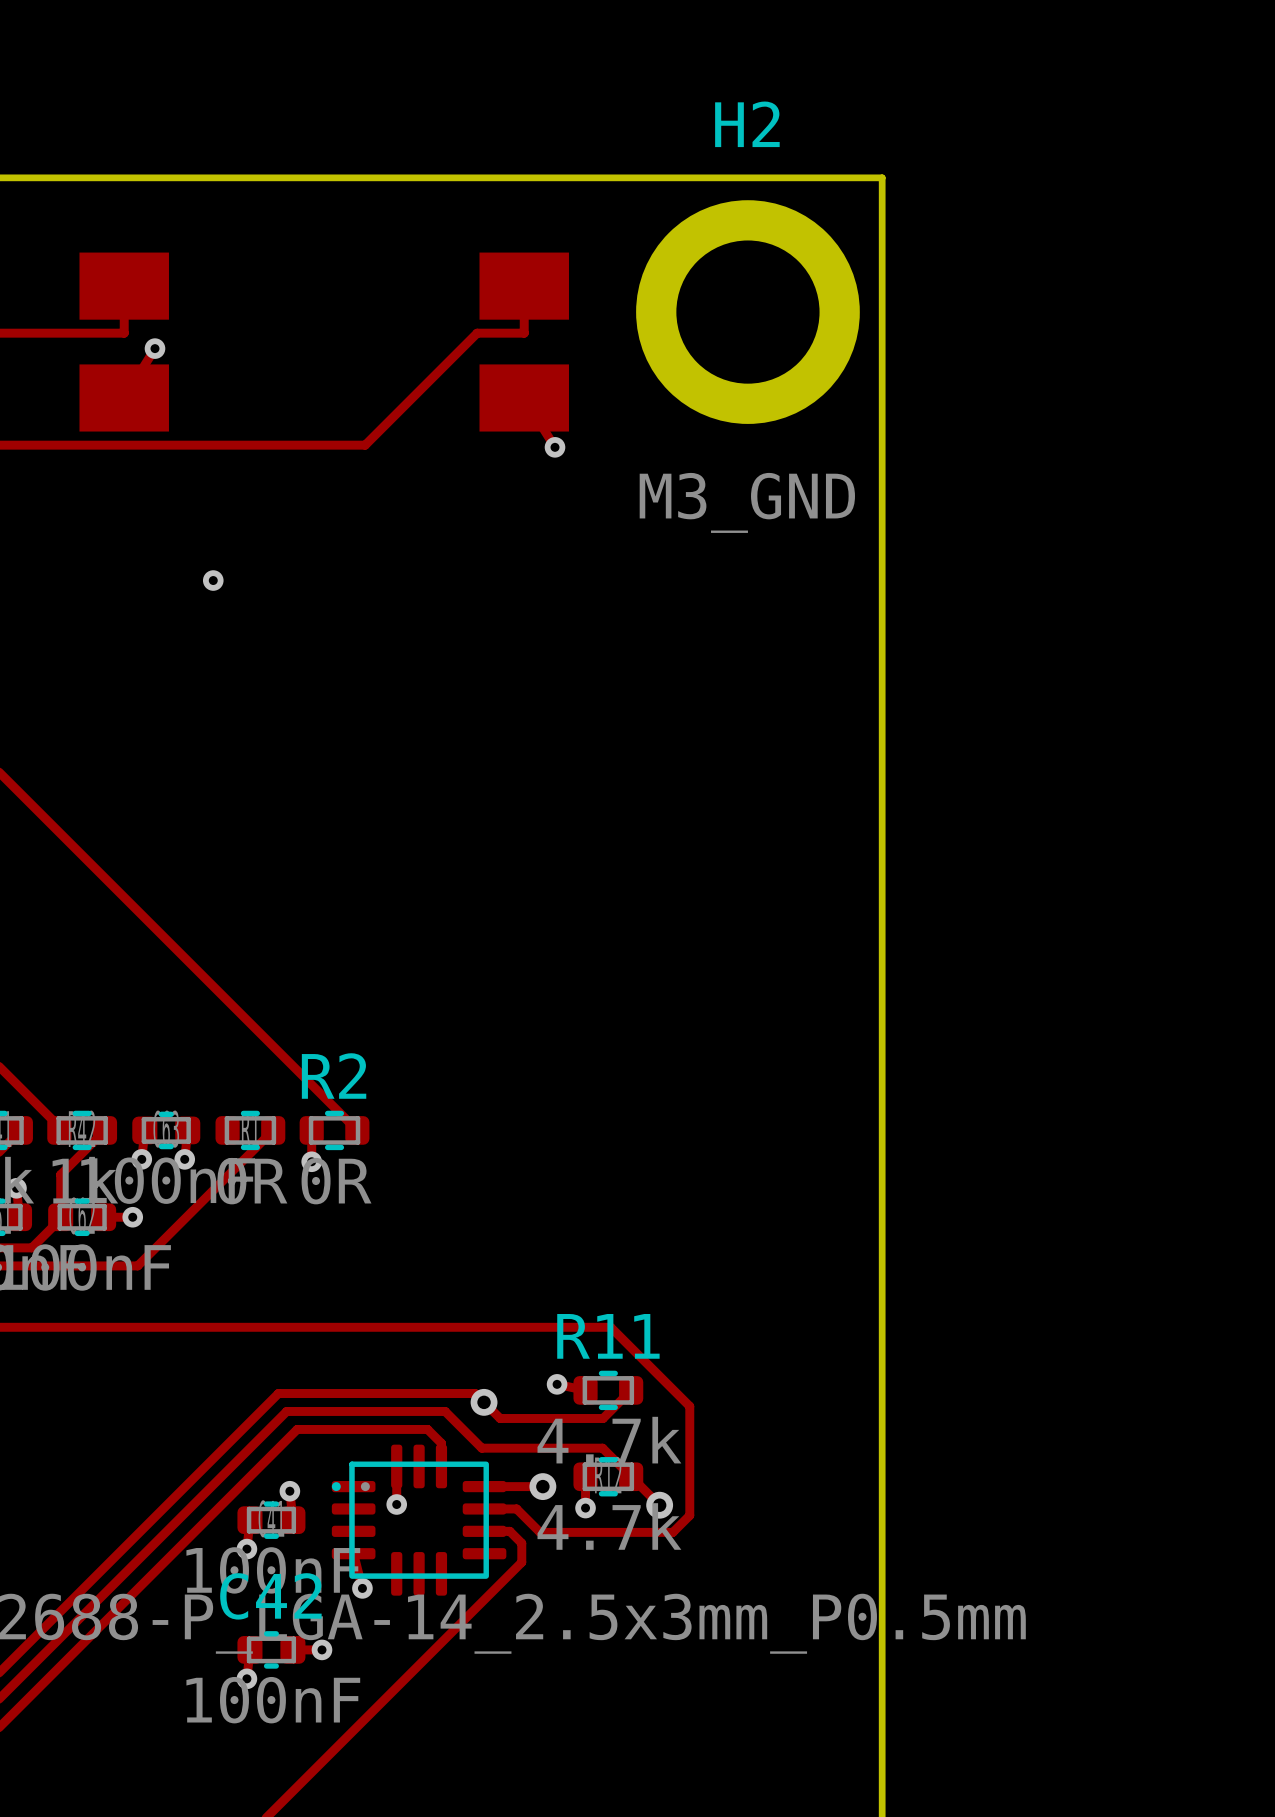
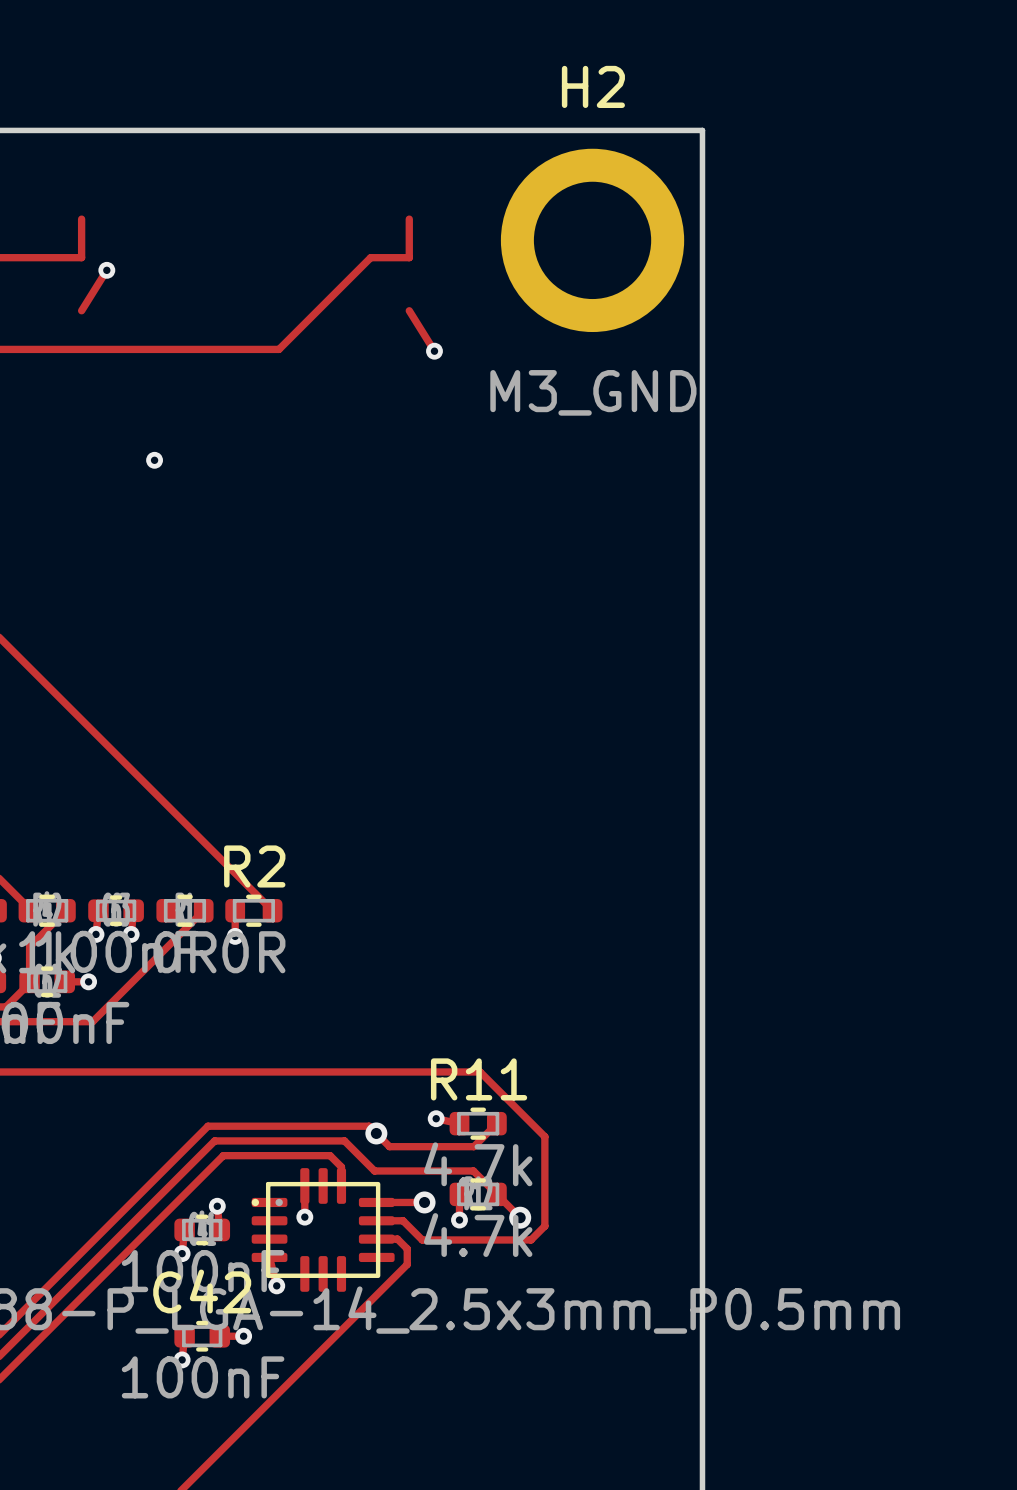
part: (124, 342) -> none
part: (524, 342) -> none

